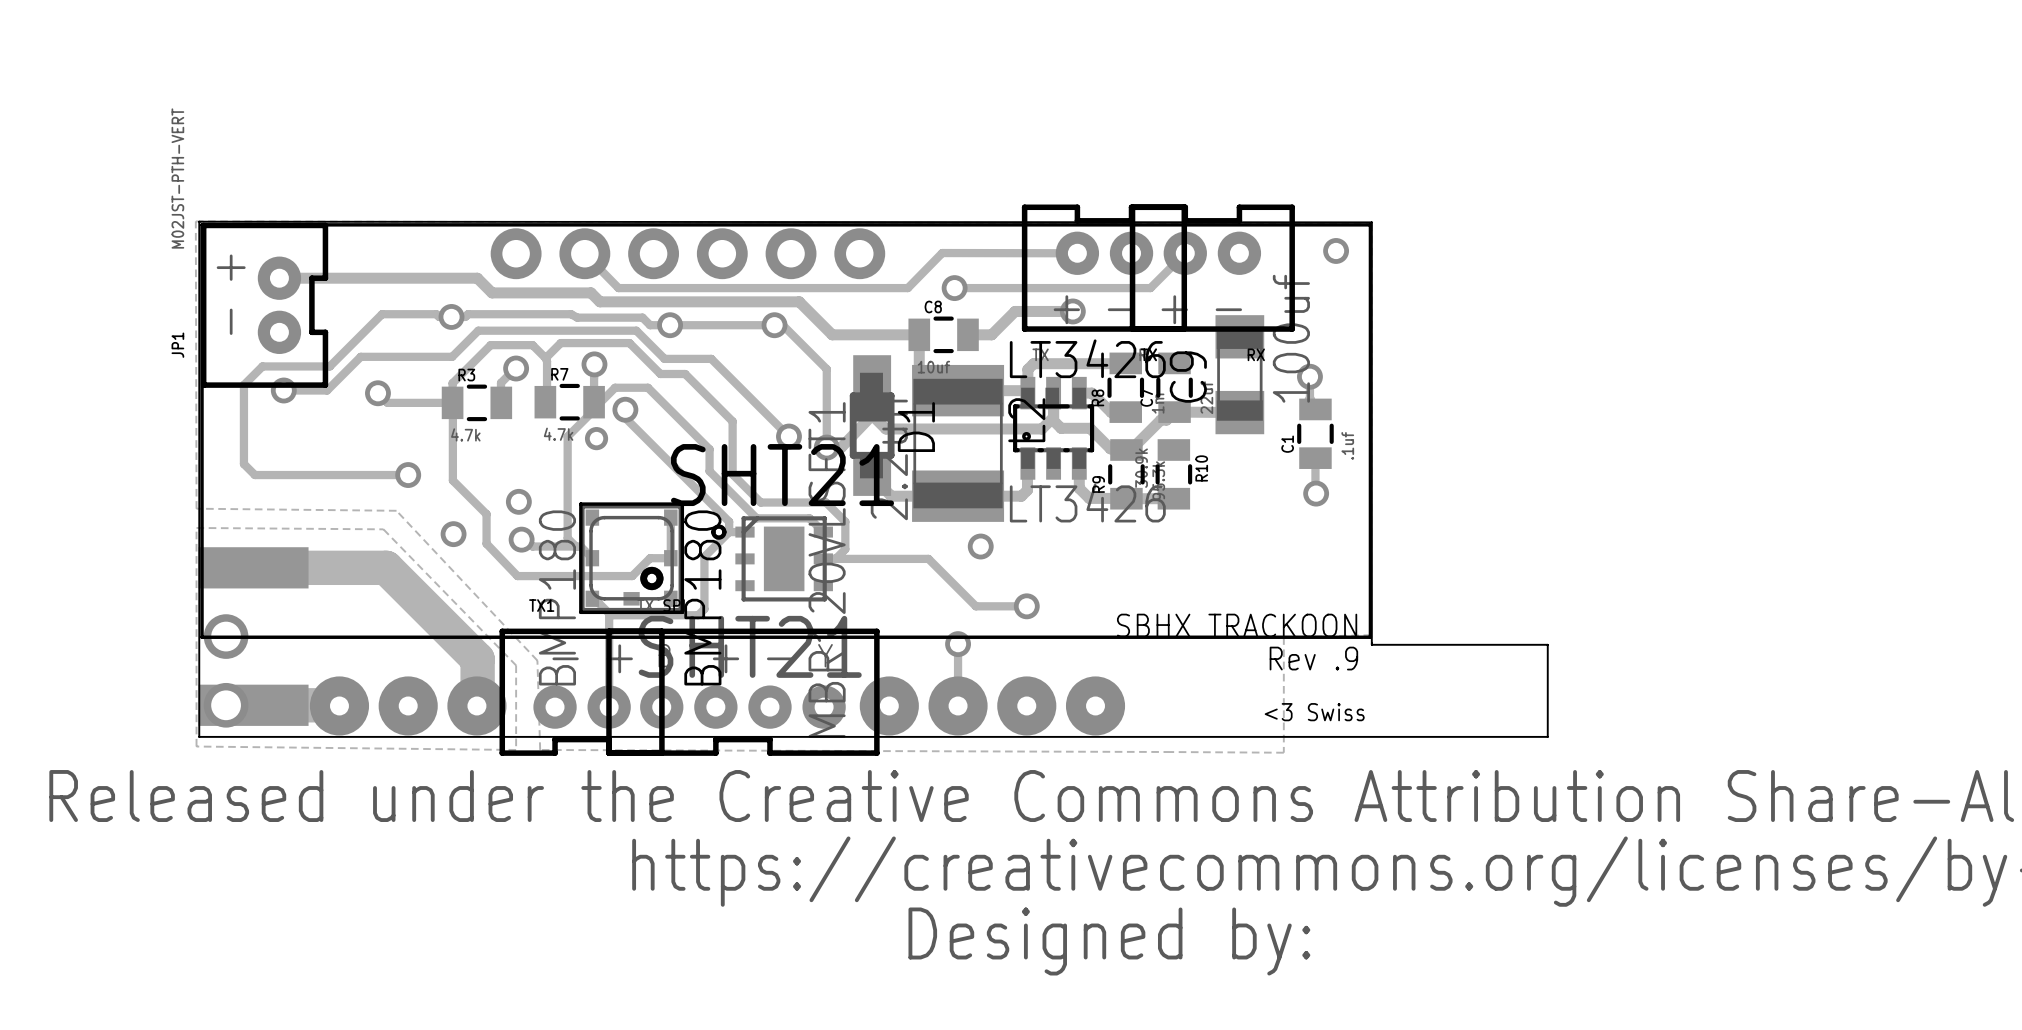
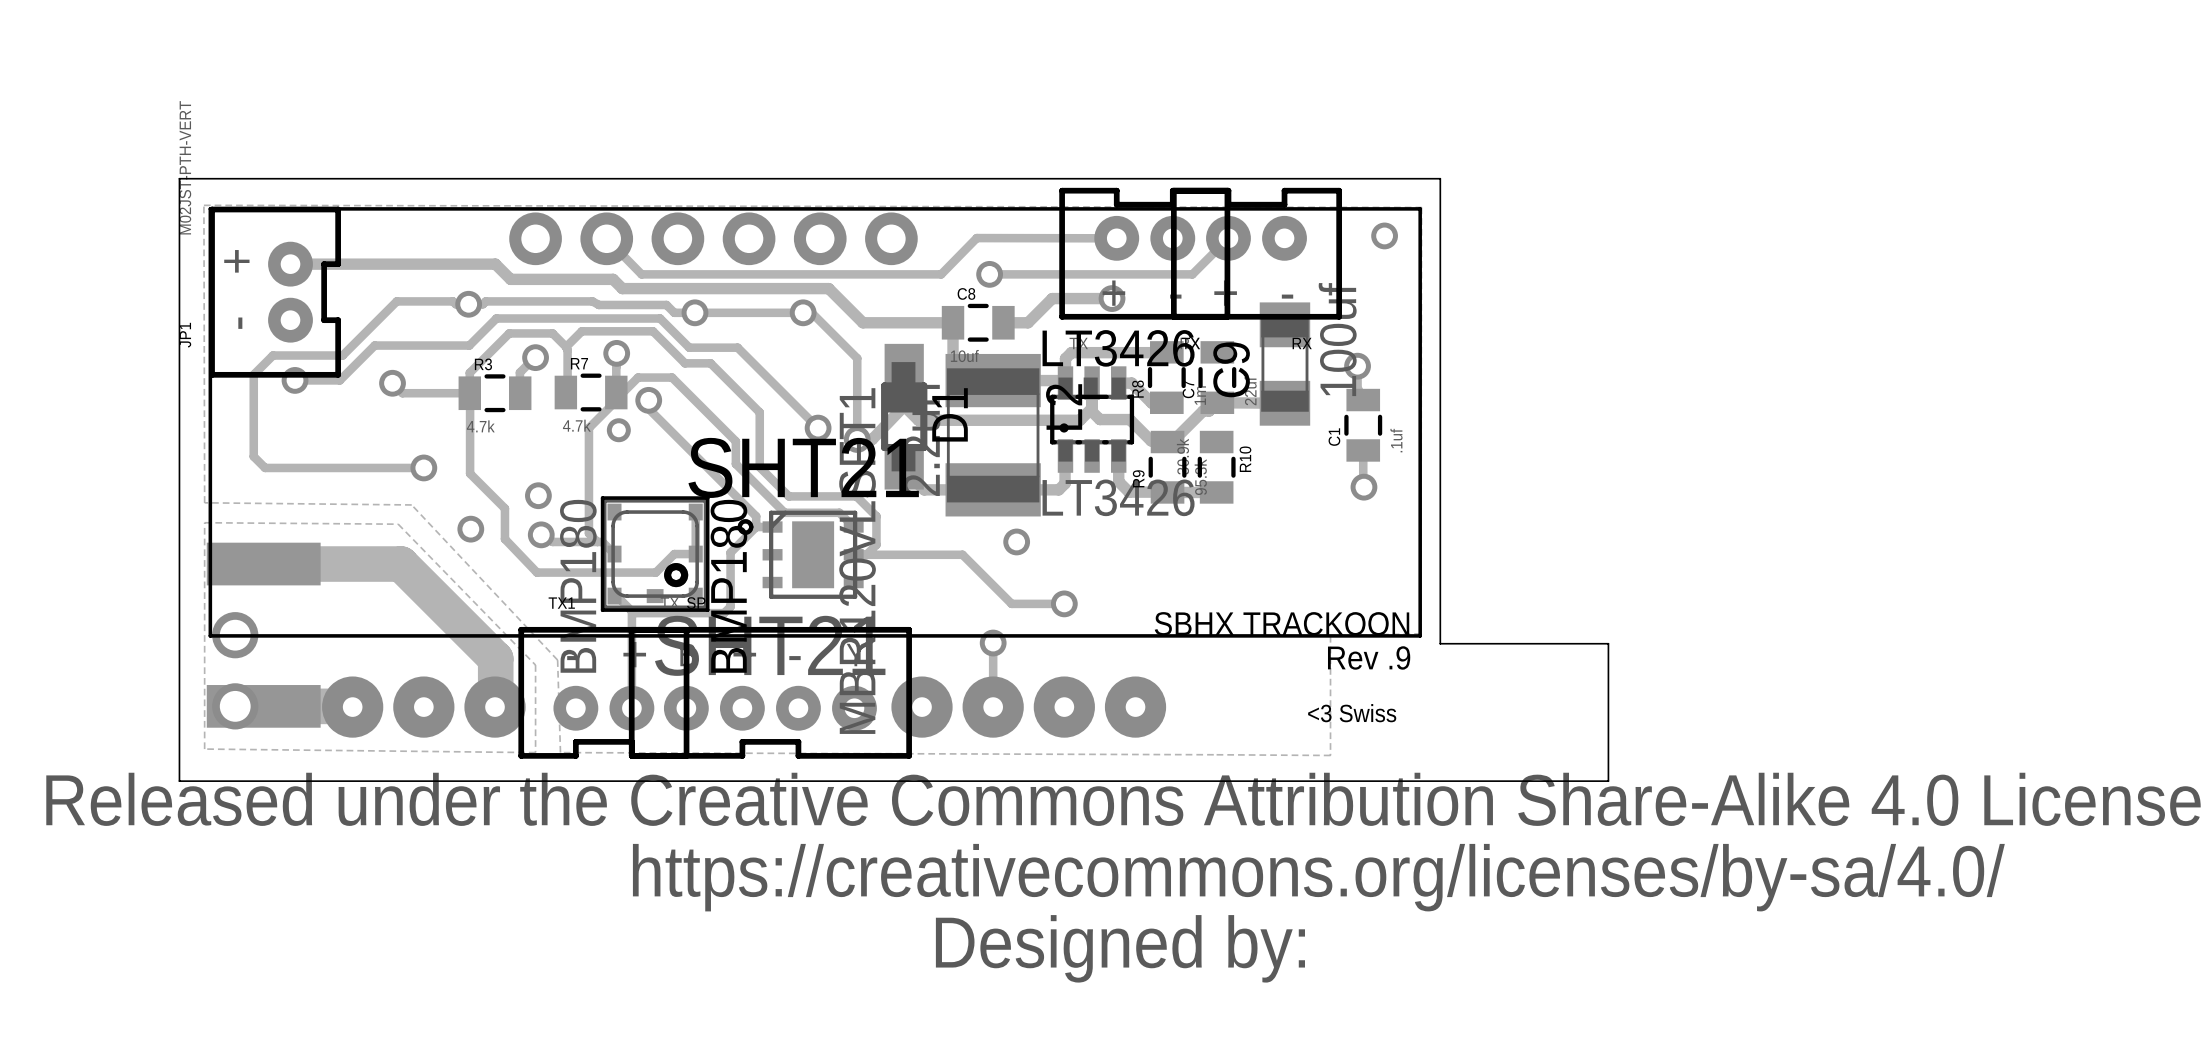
board edge: (1389, 644) (1371, 644) (1371, 222) (199, 221) (199, 736) (1547, 736) (1547, 644) -> (1440, 643) (1440, 178) (179, 178) (179, 781) (1608, 781) (1608, 643) (1603, 643)

